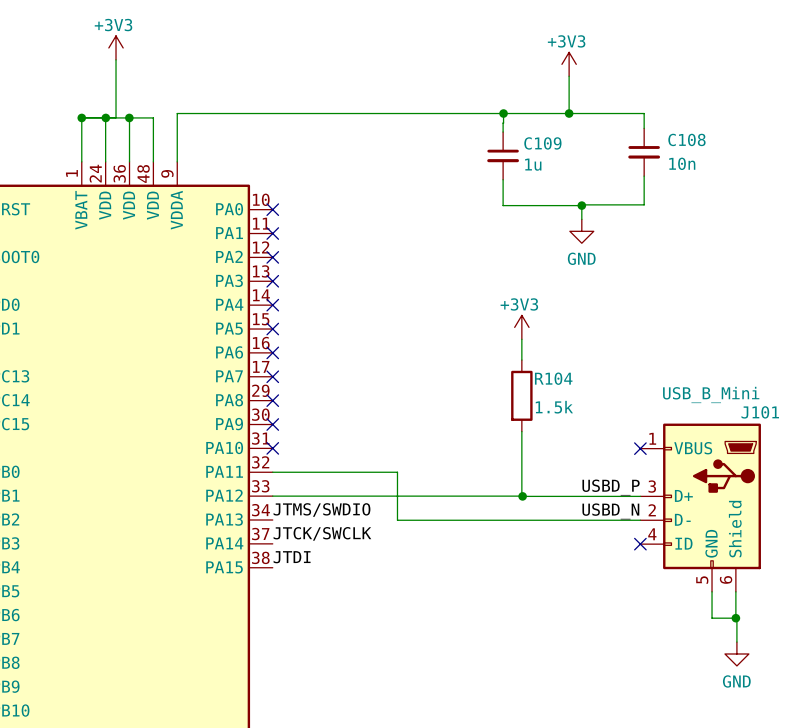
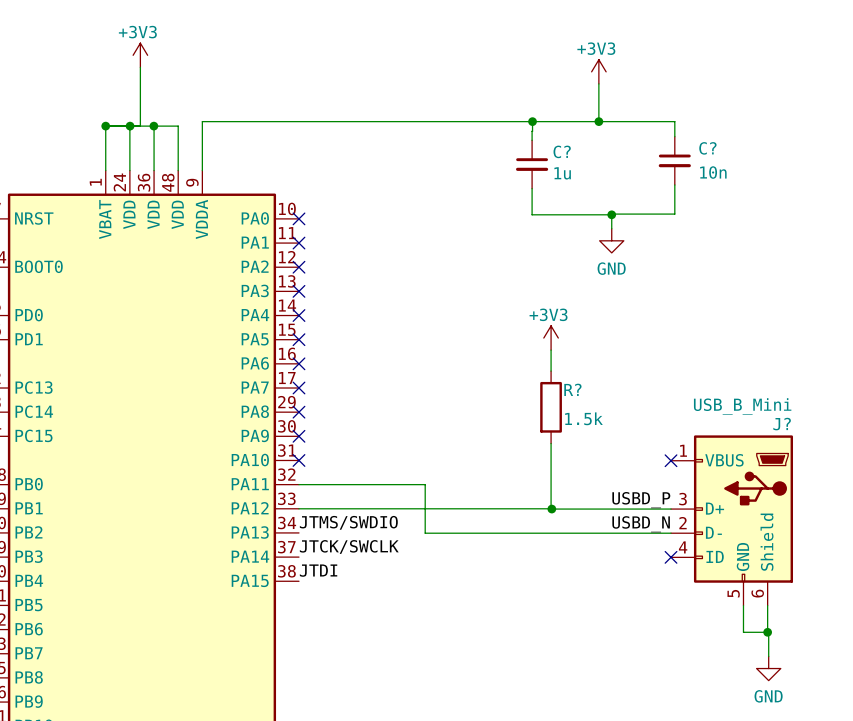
C108 name: C108 (686, 139) -> C? (707, 148)
C109 name: C109 (542, 143) -> C? (562, 151)
R104 name: R104 (553, 378) -> R? (572, 389)
J101 name: J101 (760, 412) -> J? (782, 424)

